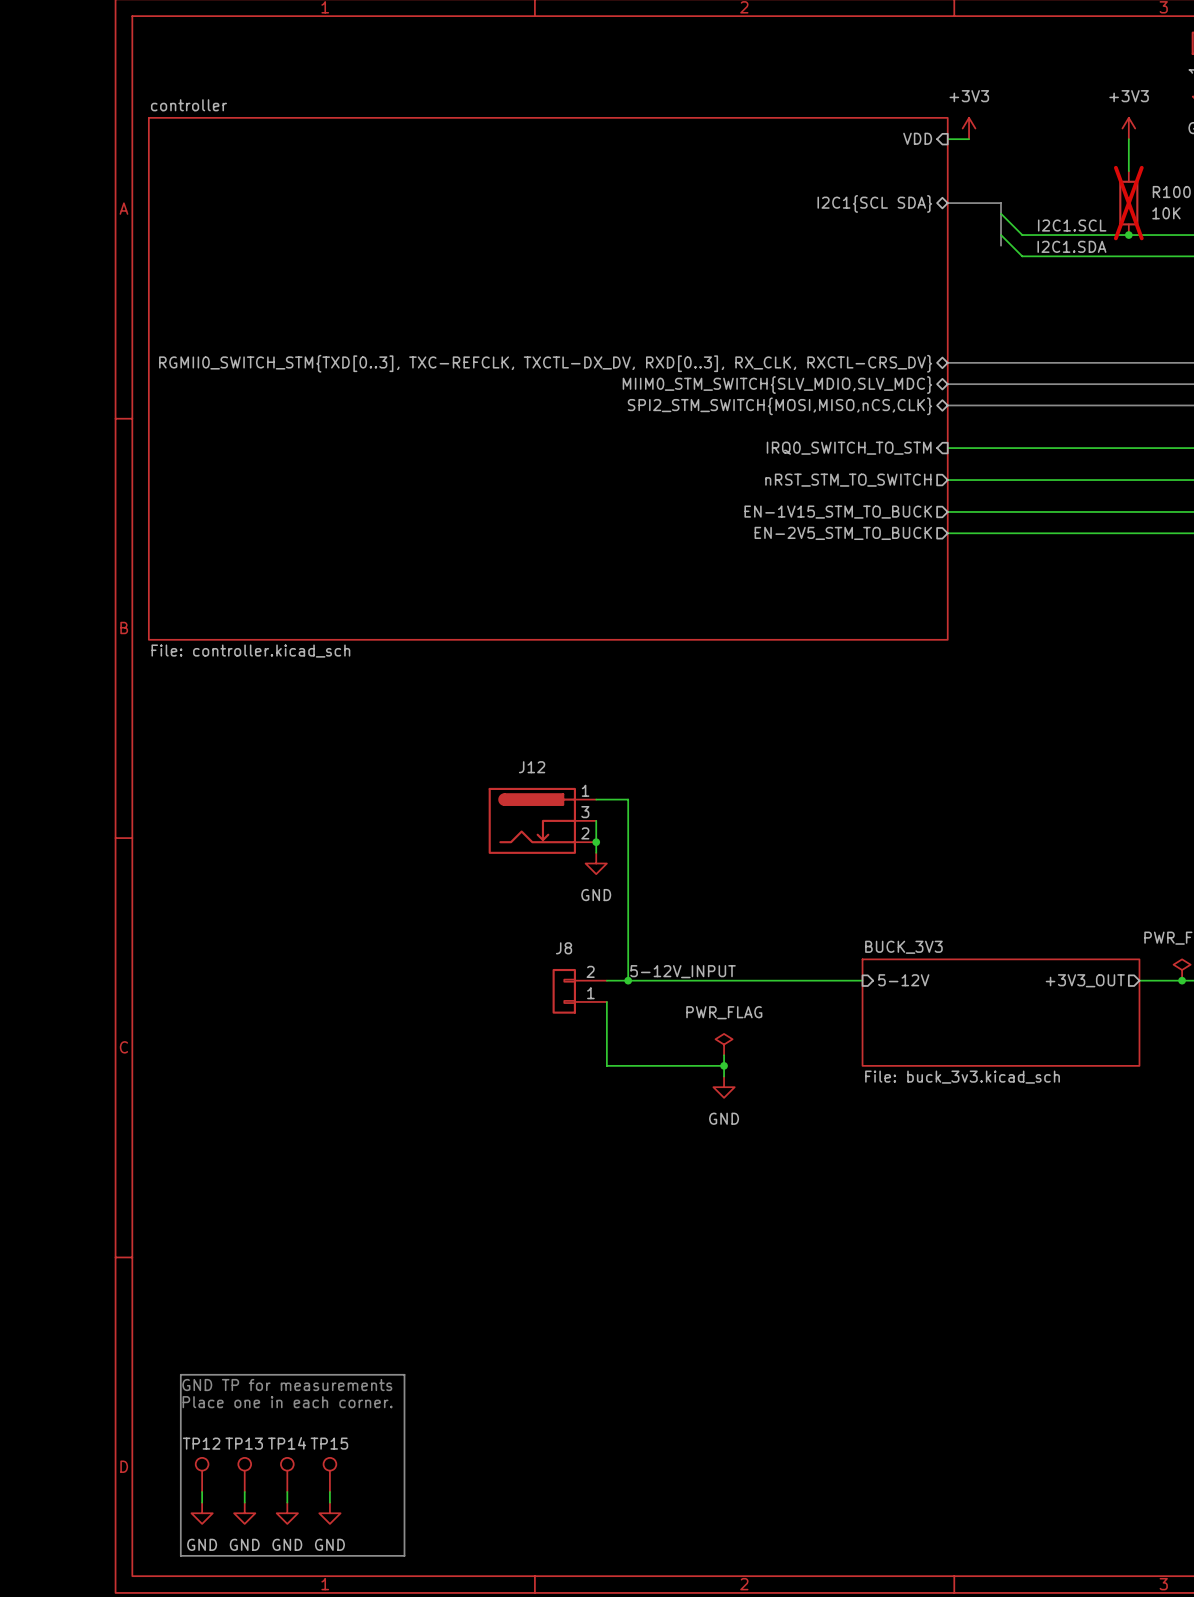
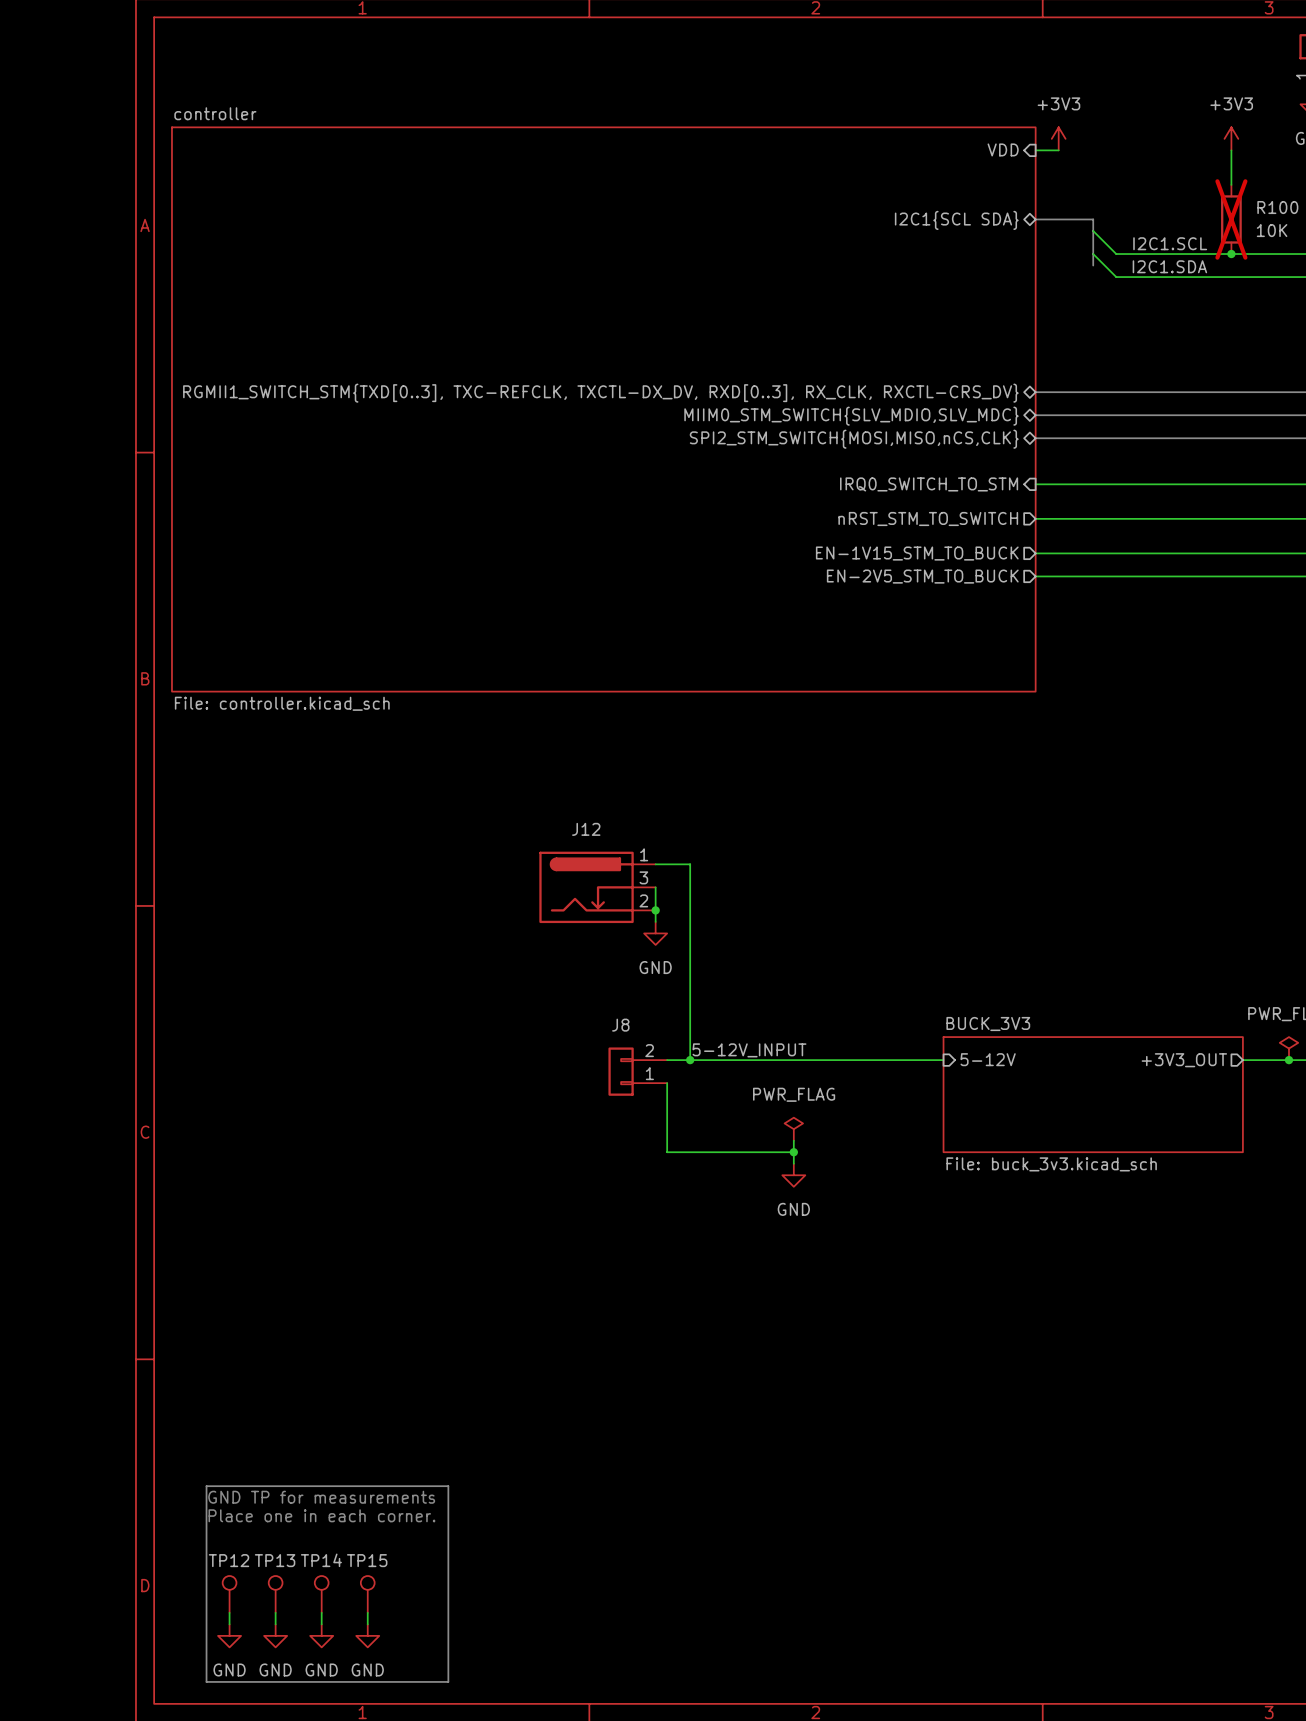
sheet pin: RGMII0_SWITCH_STM{TXD[0..3], TXC-REFCLK, TXCTL-DX_DV, RXD[0..3], RX_CLK, RXCTL-CRS_DV} (545, 363) -> RGMII1_SWITCH_STM{TXD[0..3], TXC-REFCLK, TXCTL-DX_DV, RXD[0..3], RX_CLK, RXCTL-CRS_DV} (600, 393)

